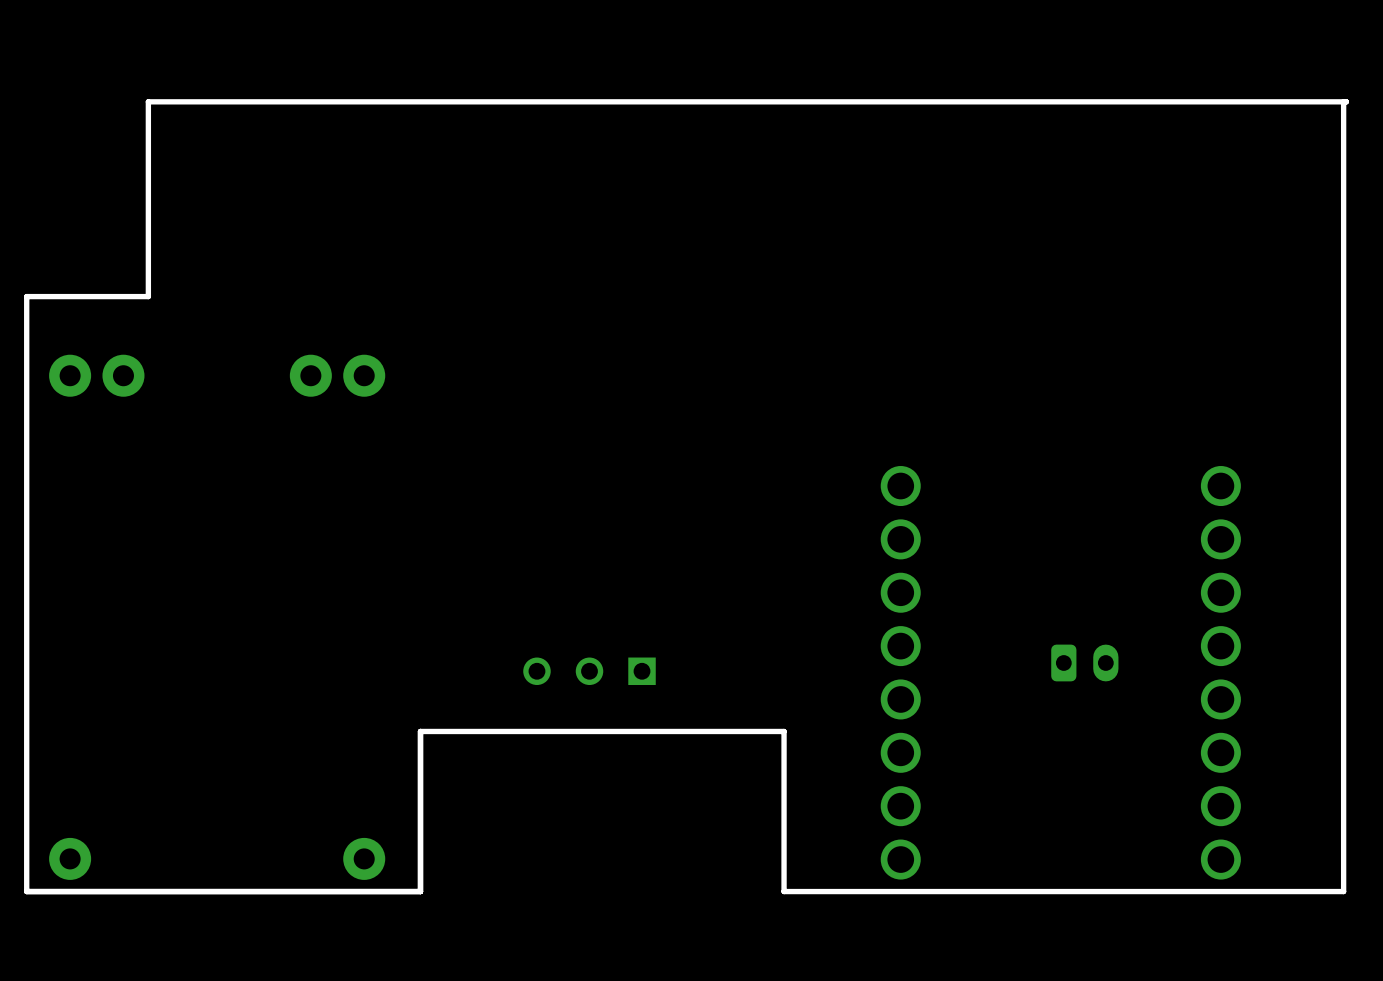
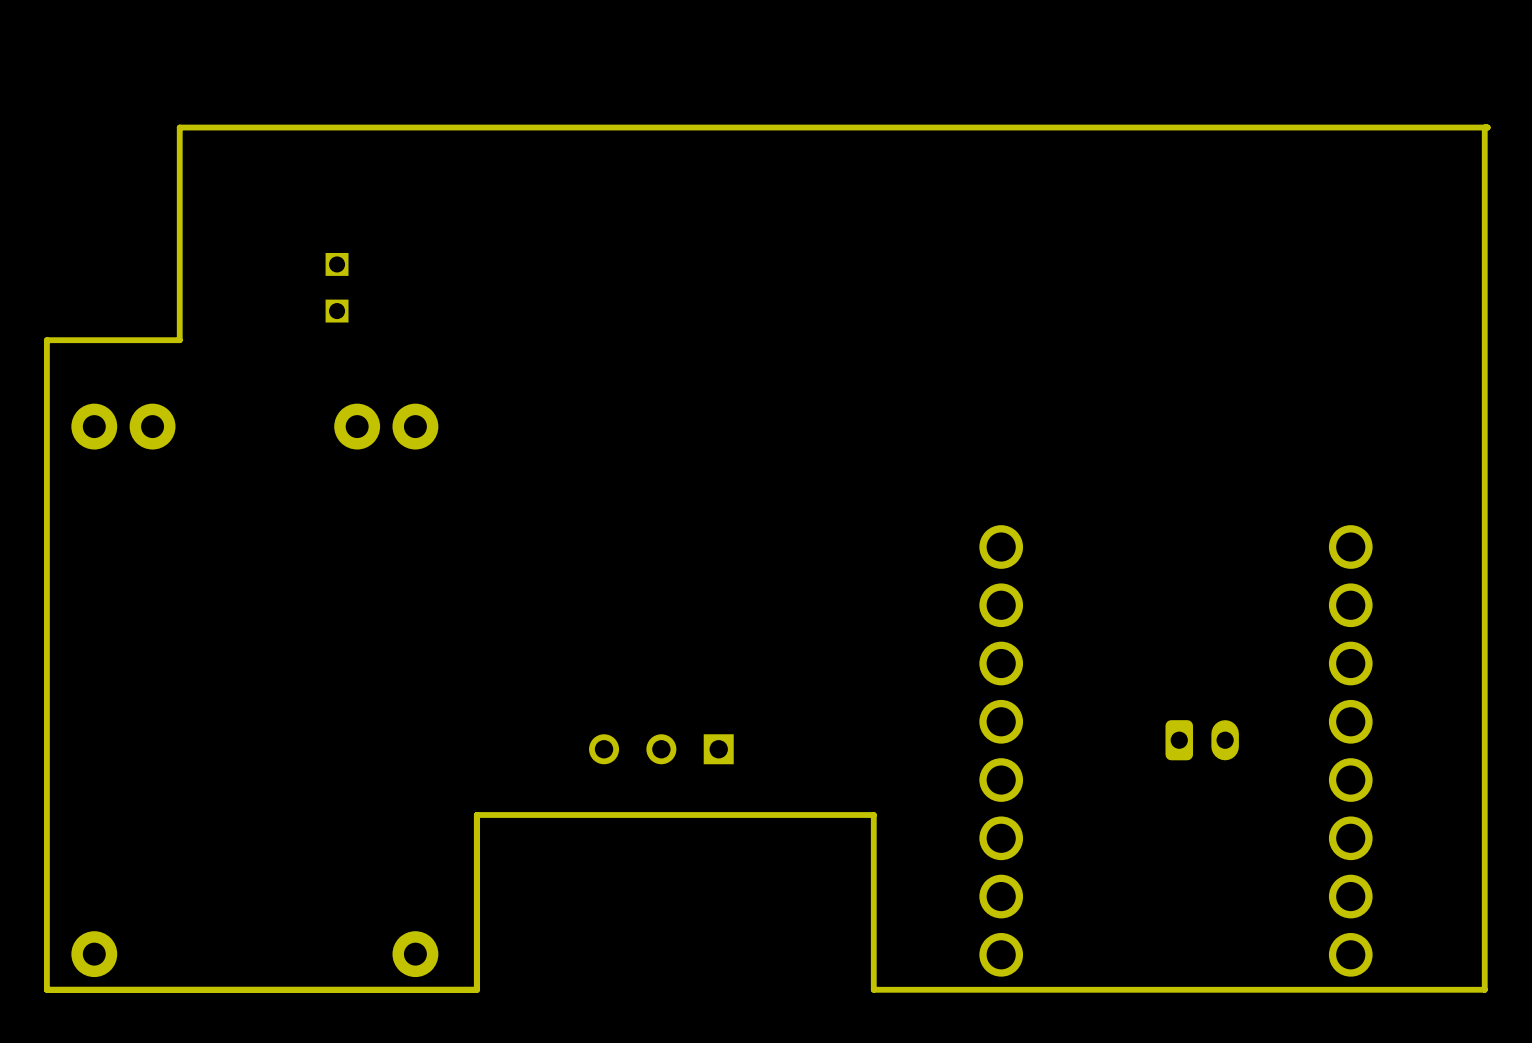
part: none -> (337, 264)
part: none -> (337, 311)

